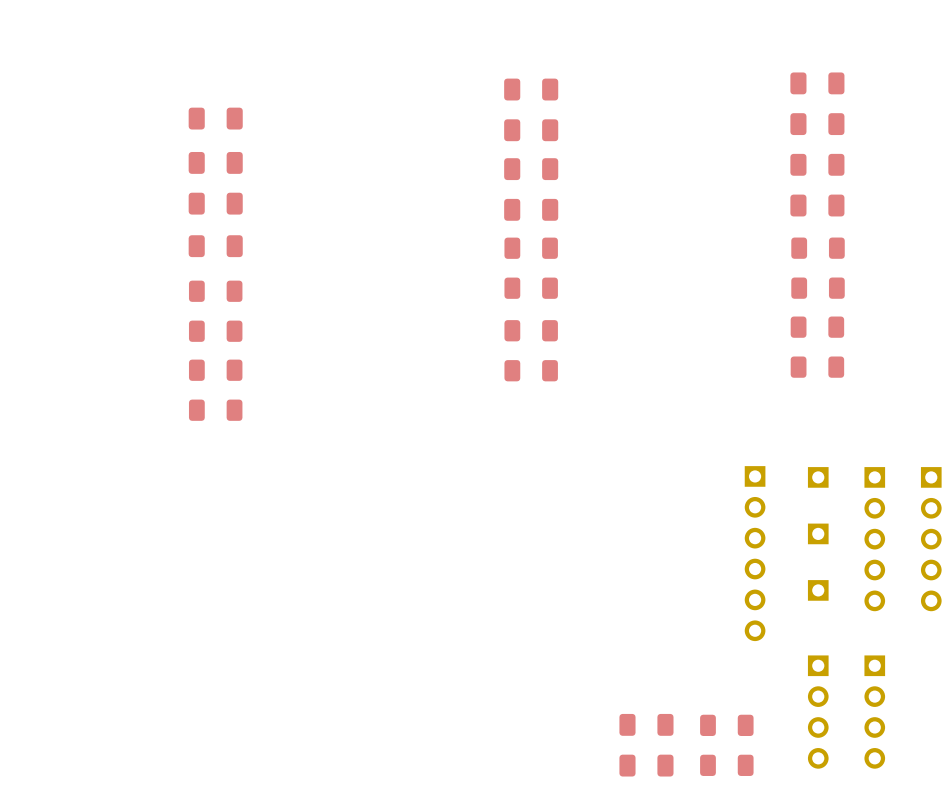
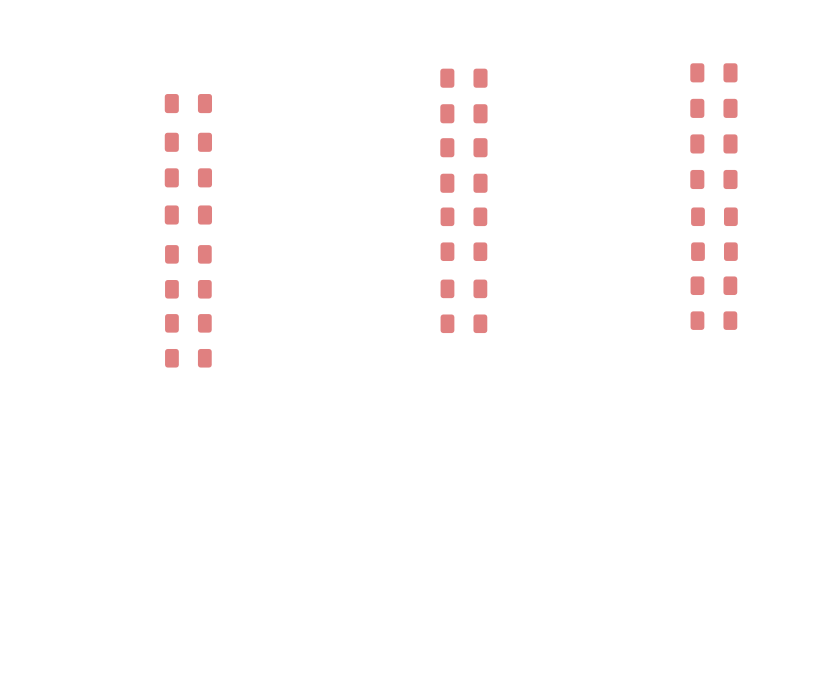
part: (818, 477) -> none
part: (818, 533) -> none
part: (874, 539) -> none
part: (931, 539) -> none
part: (755, 553) -> none
part: (818, 590) -> none
part: (818, 712) -> none
part: (874, 712) -> none
part: (646, 724) -> none
part: (726, 725) -> none
part: (646, 765) -> none
part: (726, 765) -> none

